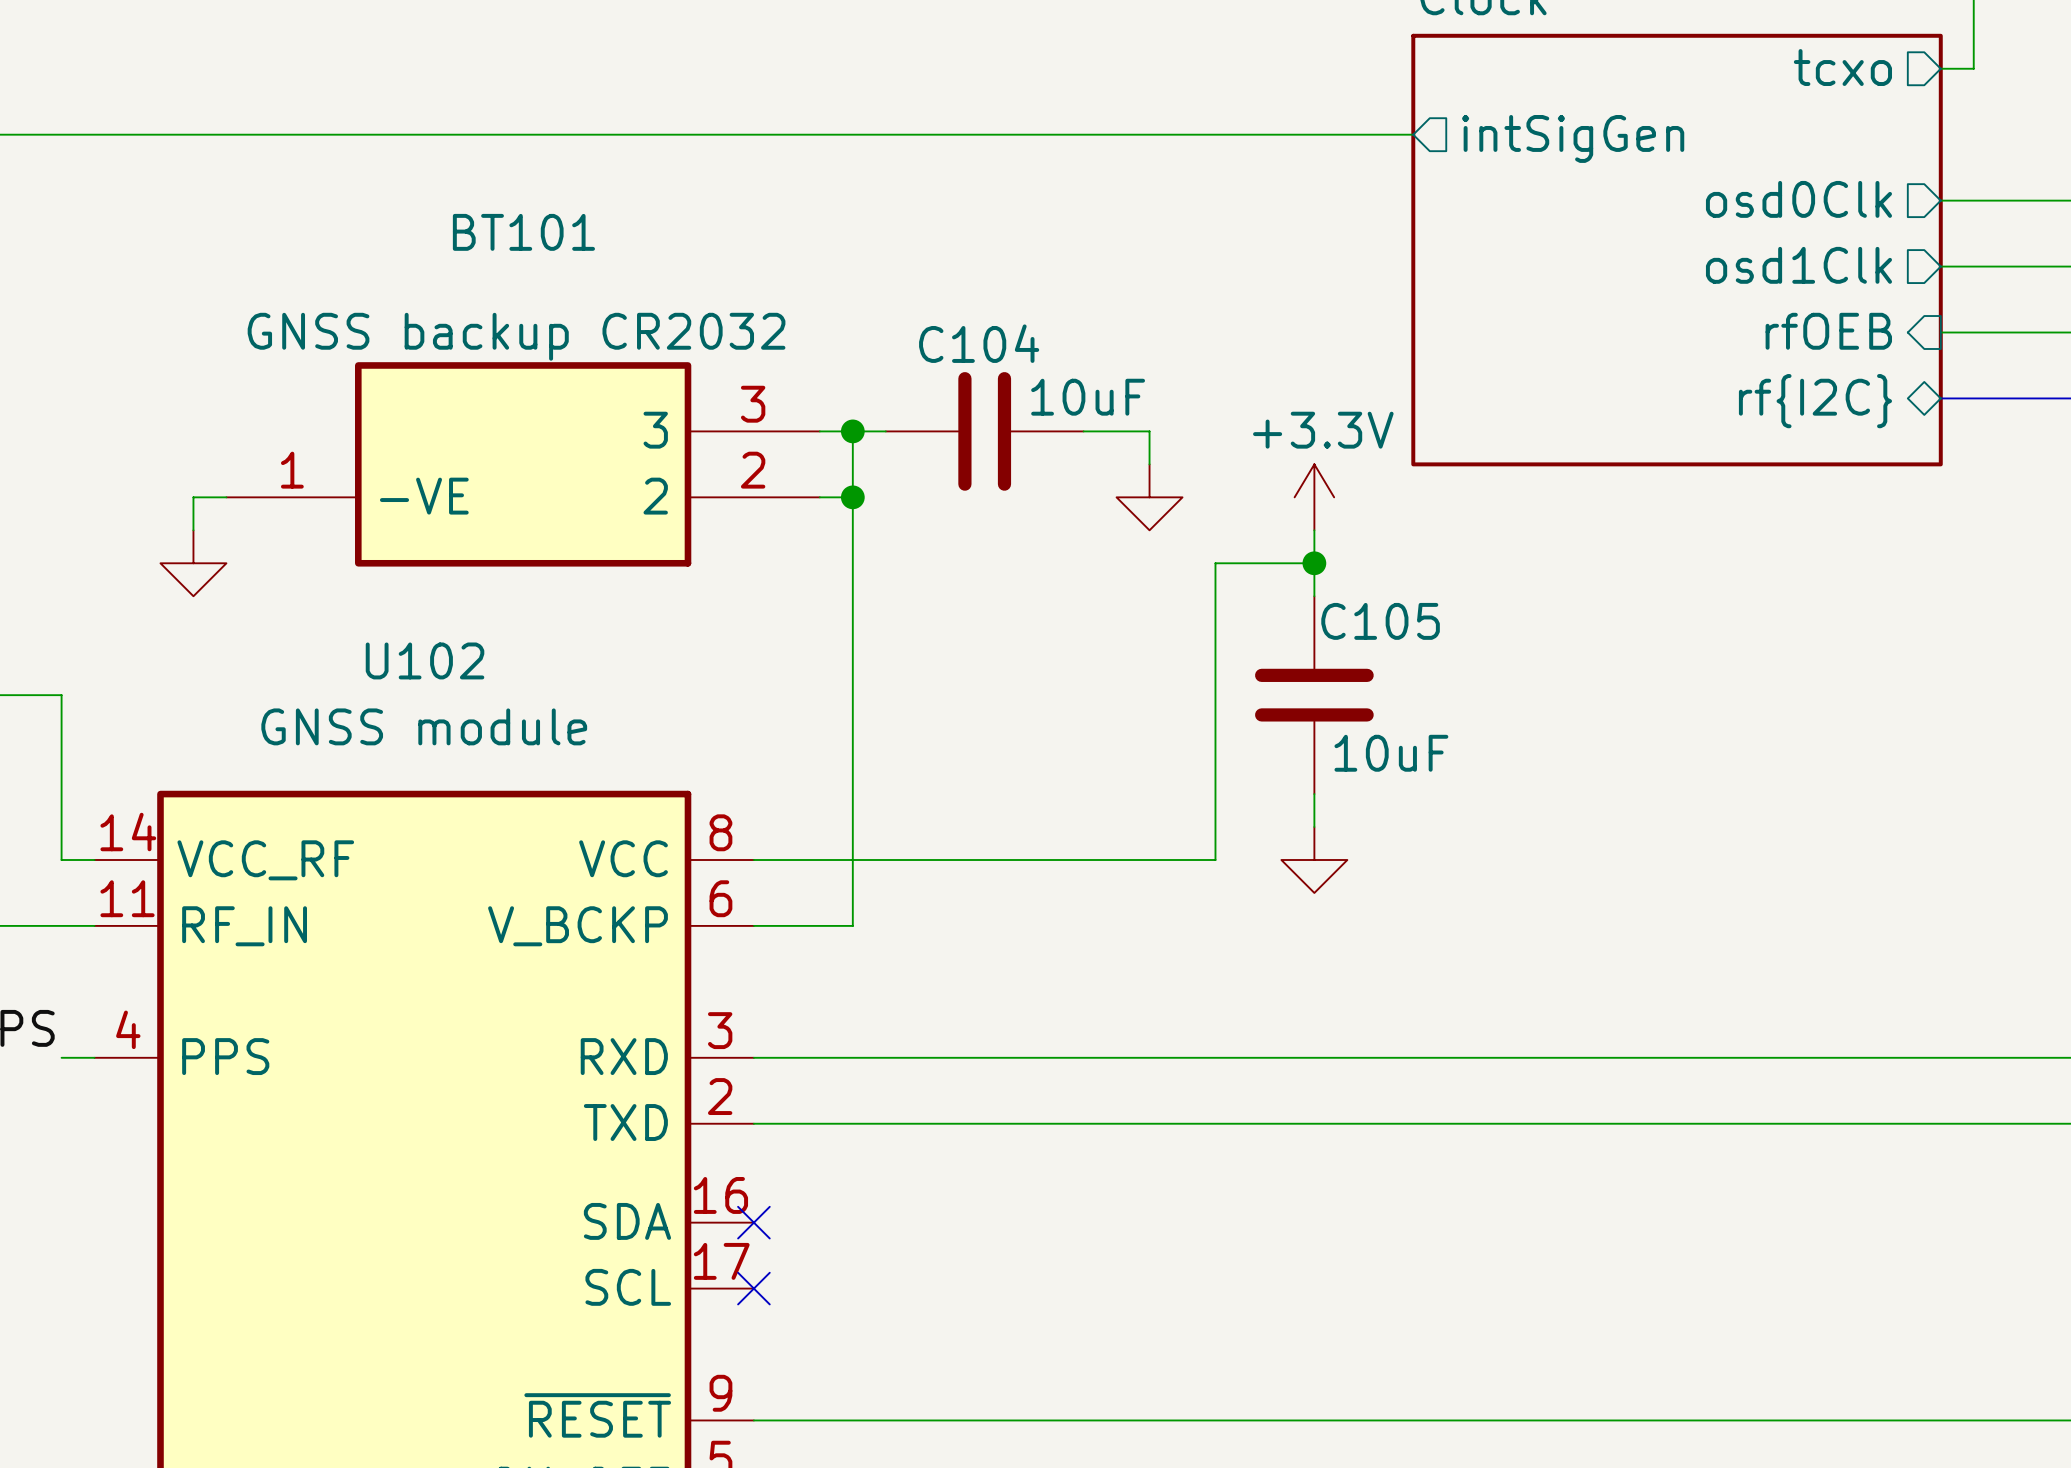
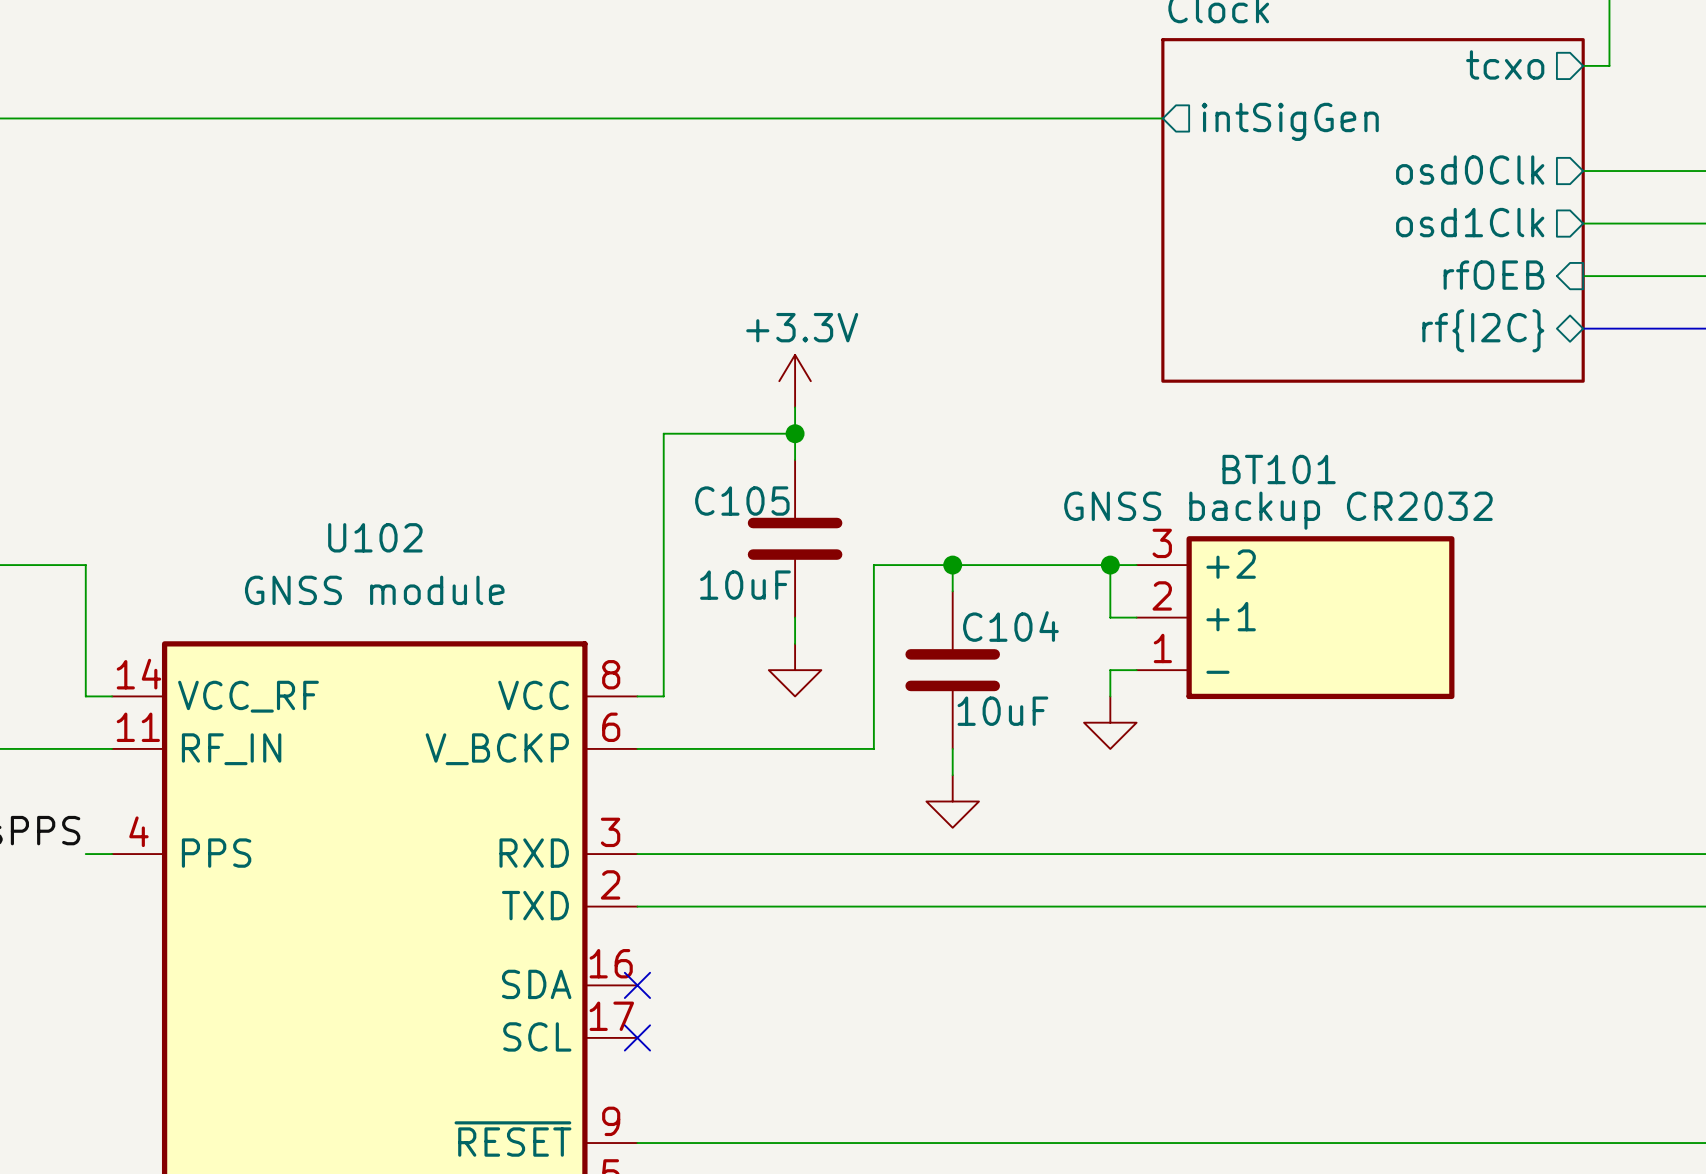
C104 name position: C104 (979, 343) -> C104 (1010, 626)
BT101 symbol: [226, 362, 820, 567] -> [1136, 536, 1455, 700]
C104 value position: 10uF (1088, 397) -> 10uF (1002, 711)
wire: (819, 431) (885, 431) -> none
wire: (852, 431) (852, 925) -> (1136, 565) (873, 565) (873, 748) (716, 748)
junction: (852, 431) -> none
C104 rotation: 0° (984, 431) -> 90° clockwise (952, 670)
C104 position: (984, 431) -> (952, 670)
wire: (1083, 431) (1149, 431) (1149, 464) -> none
wire: (226, 497) (193, 497) (193, 530) -> none
wire: (819, 497) (852, 497) -> none
junction: (852, 497) -> none
power symbol: (1149, 497) -> none
power symbol position: +3.3V (1314, 497) -> +3.3V (795, 381)
junction: none -> (795, 433)
wire: (1314, 530) (1314, 596) -> (795, 407) (795, 459)
power symbol: (193, 563) -> none
wire: (1314, 563) (1215, 563) (1215, 859) (786, 859) -> (795, 433) (663, 433) (663, 696)
junction: (1314, 563) -> none
C105 name position: C105 (1380, 621) -> C105 (742, 501)
wire: none -> (952, 565) (952, 591)
junction: none -> (952, 565)
C105 position: (1314, 695) -> (795, 538)
wire: none -> (1110, 565) (1110, 617) (1136, 617)
junction: none -> (1110, 565)
C105 value position: 10uF (1391, 753) -> 10uF (745, 585)
wire: (1314, 794) (1314, 827) -> (795, 617) (795, 643)
power symbol: none -> (795, 670)
wire: none -> (1136, 670) (1110, 670) (1110, 696)
power symbol position: (1314, 859) -> (1110, 722)
wire: none -> (952, 748) (952, 775)
power symbol: none -> (952, 801)

